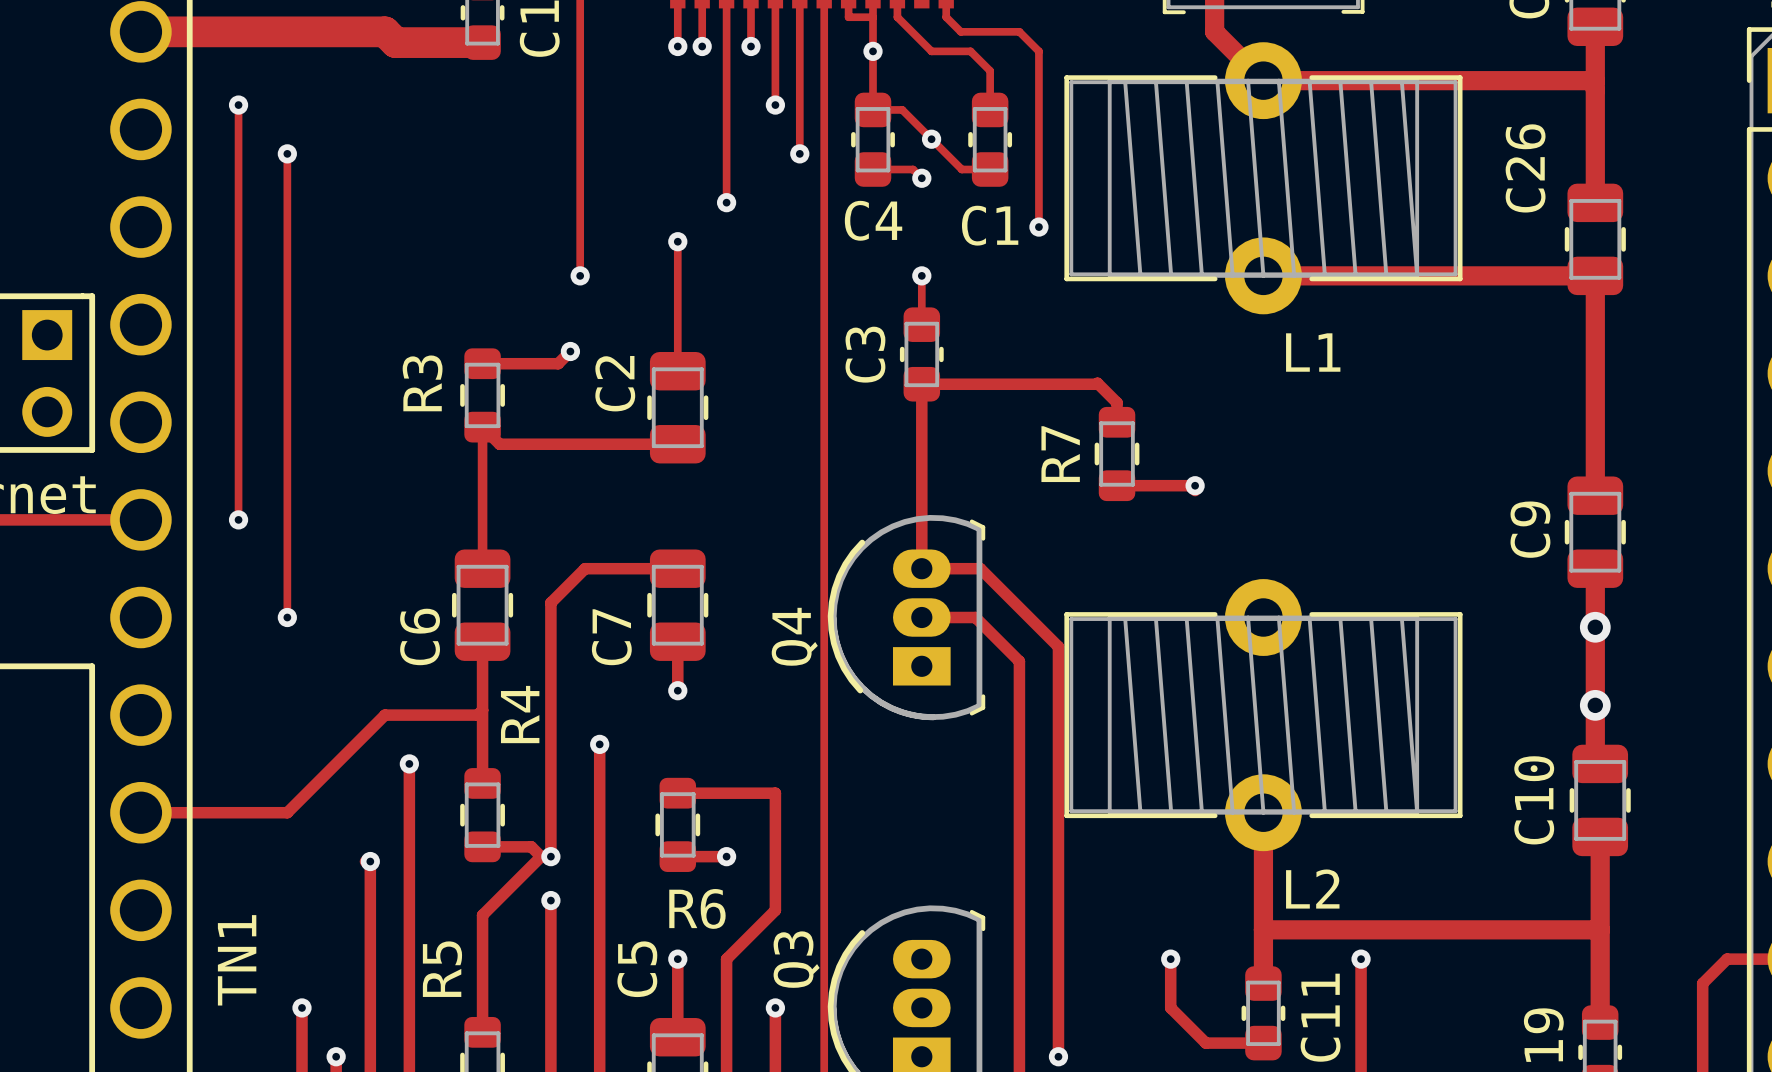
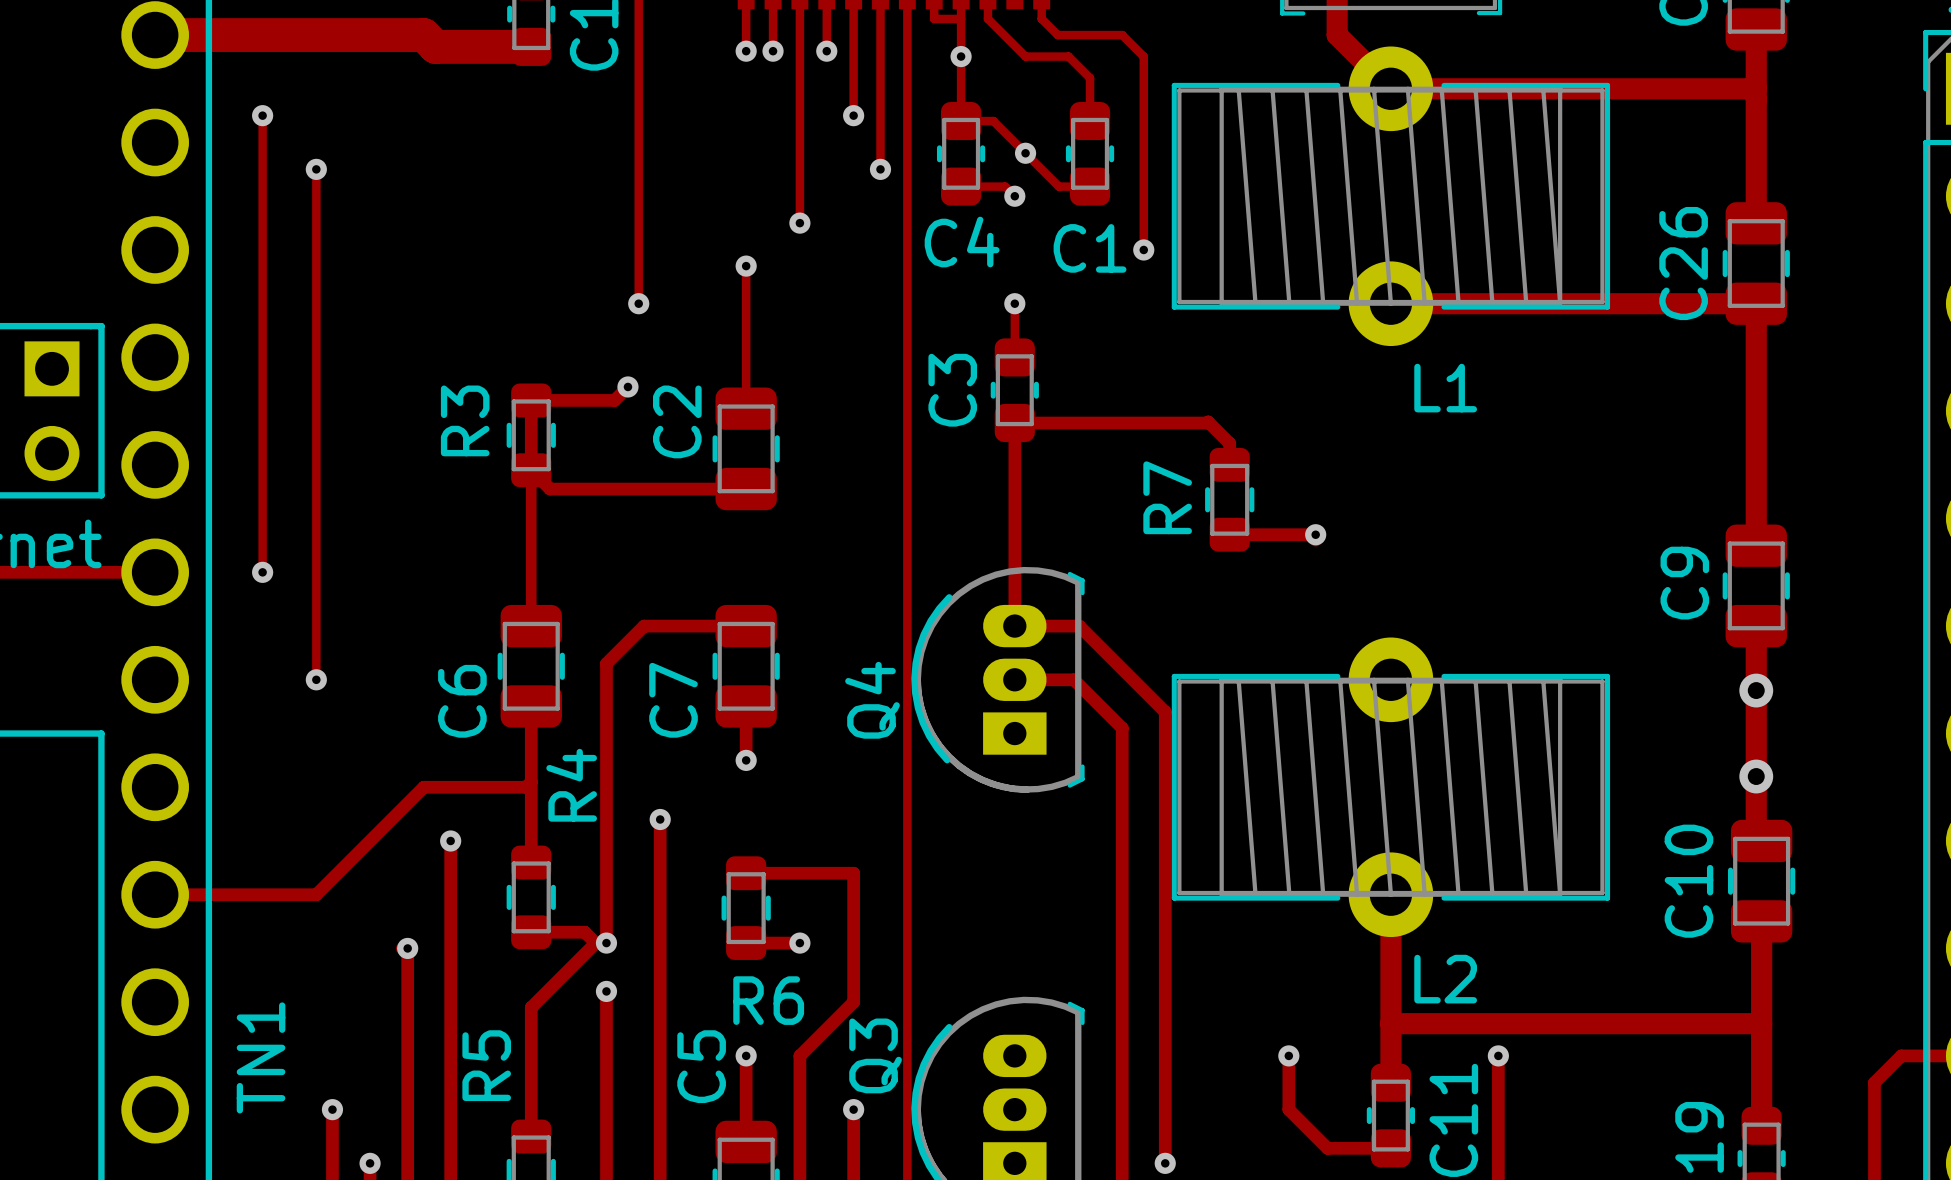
C26 name position: C26 (1525, 168) -> C26 (1683, 263)
track: none -> (531, 392) (531, 470)

